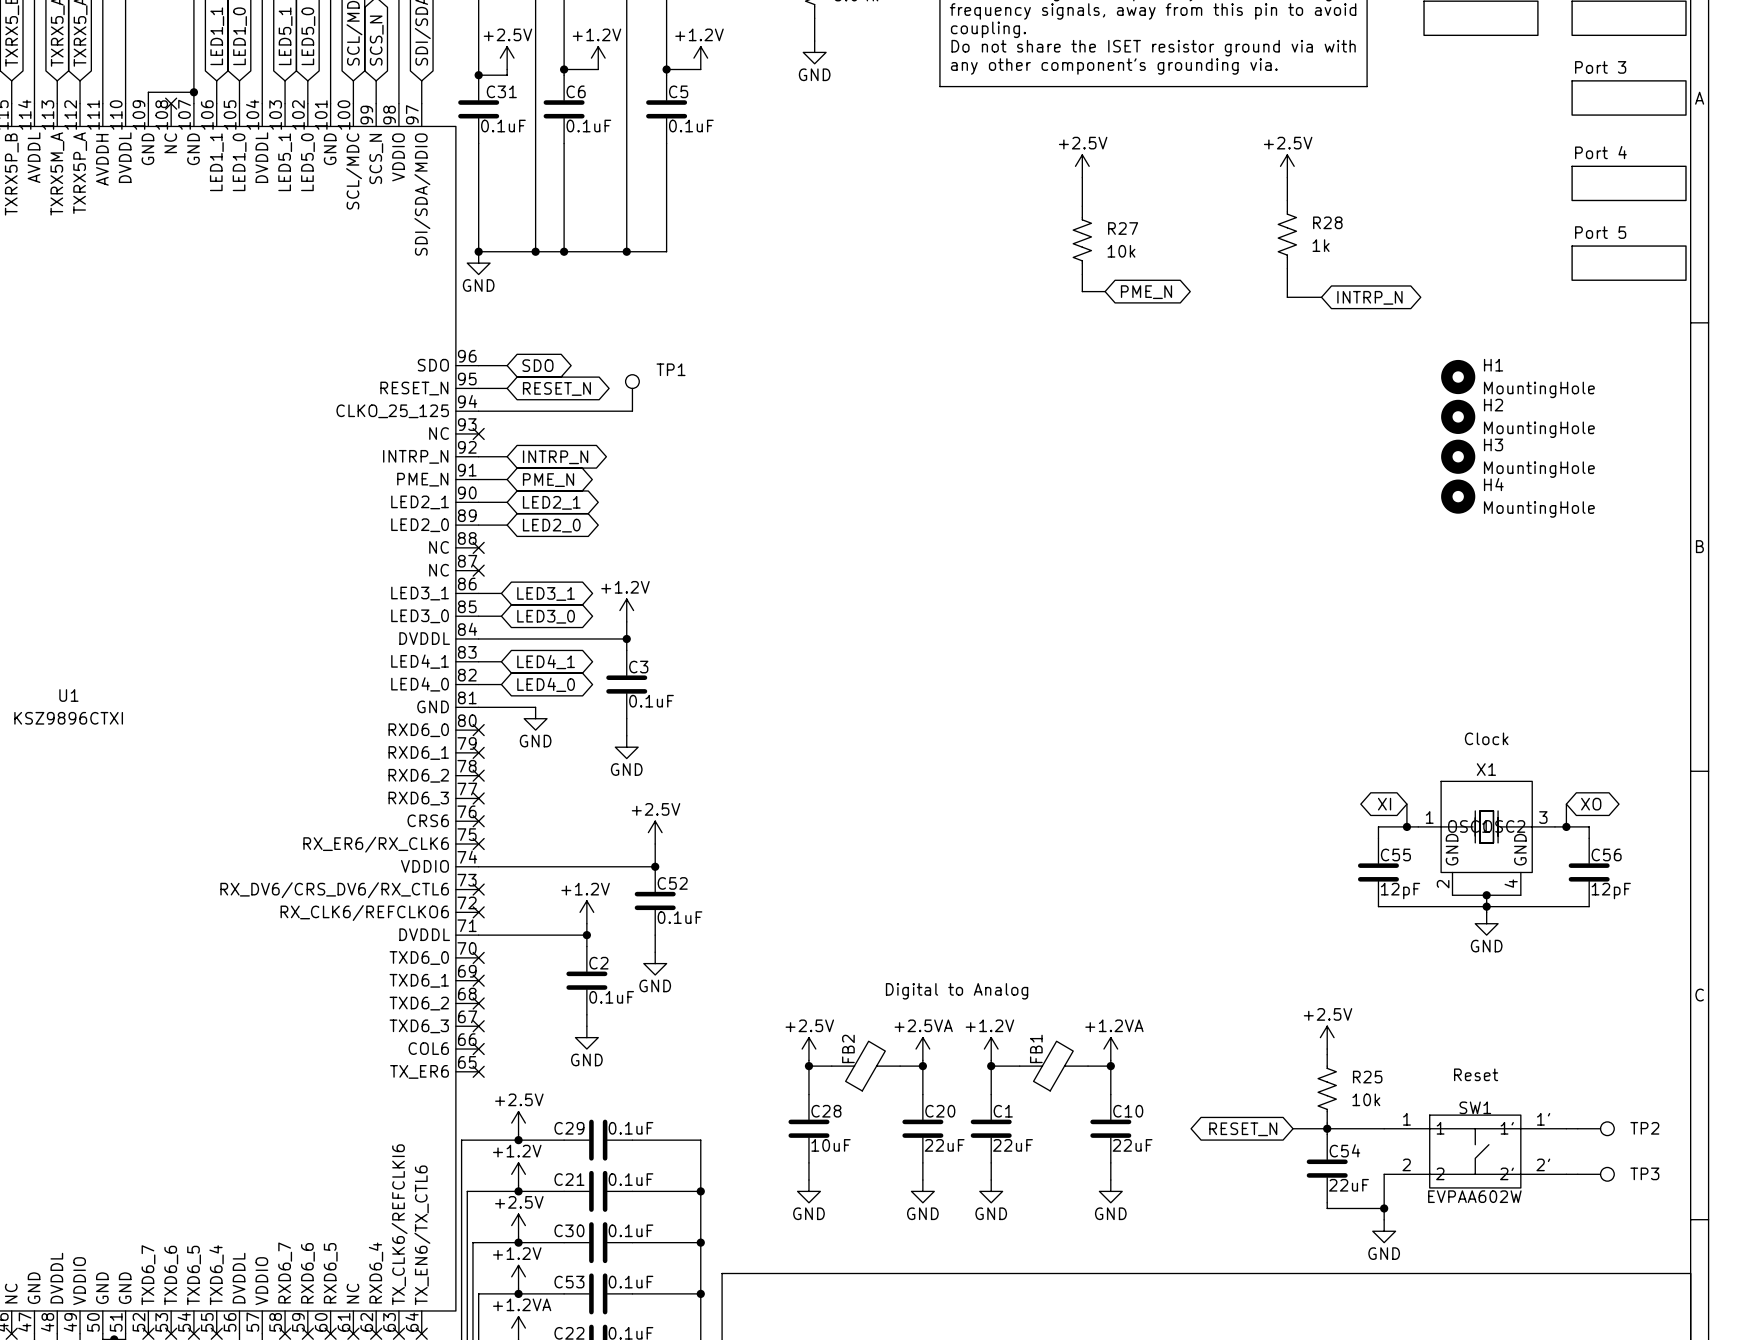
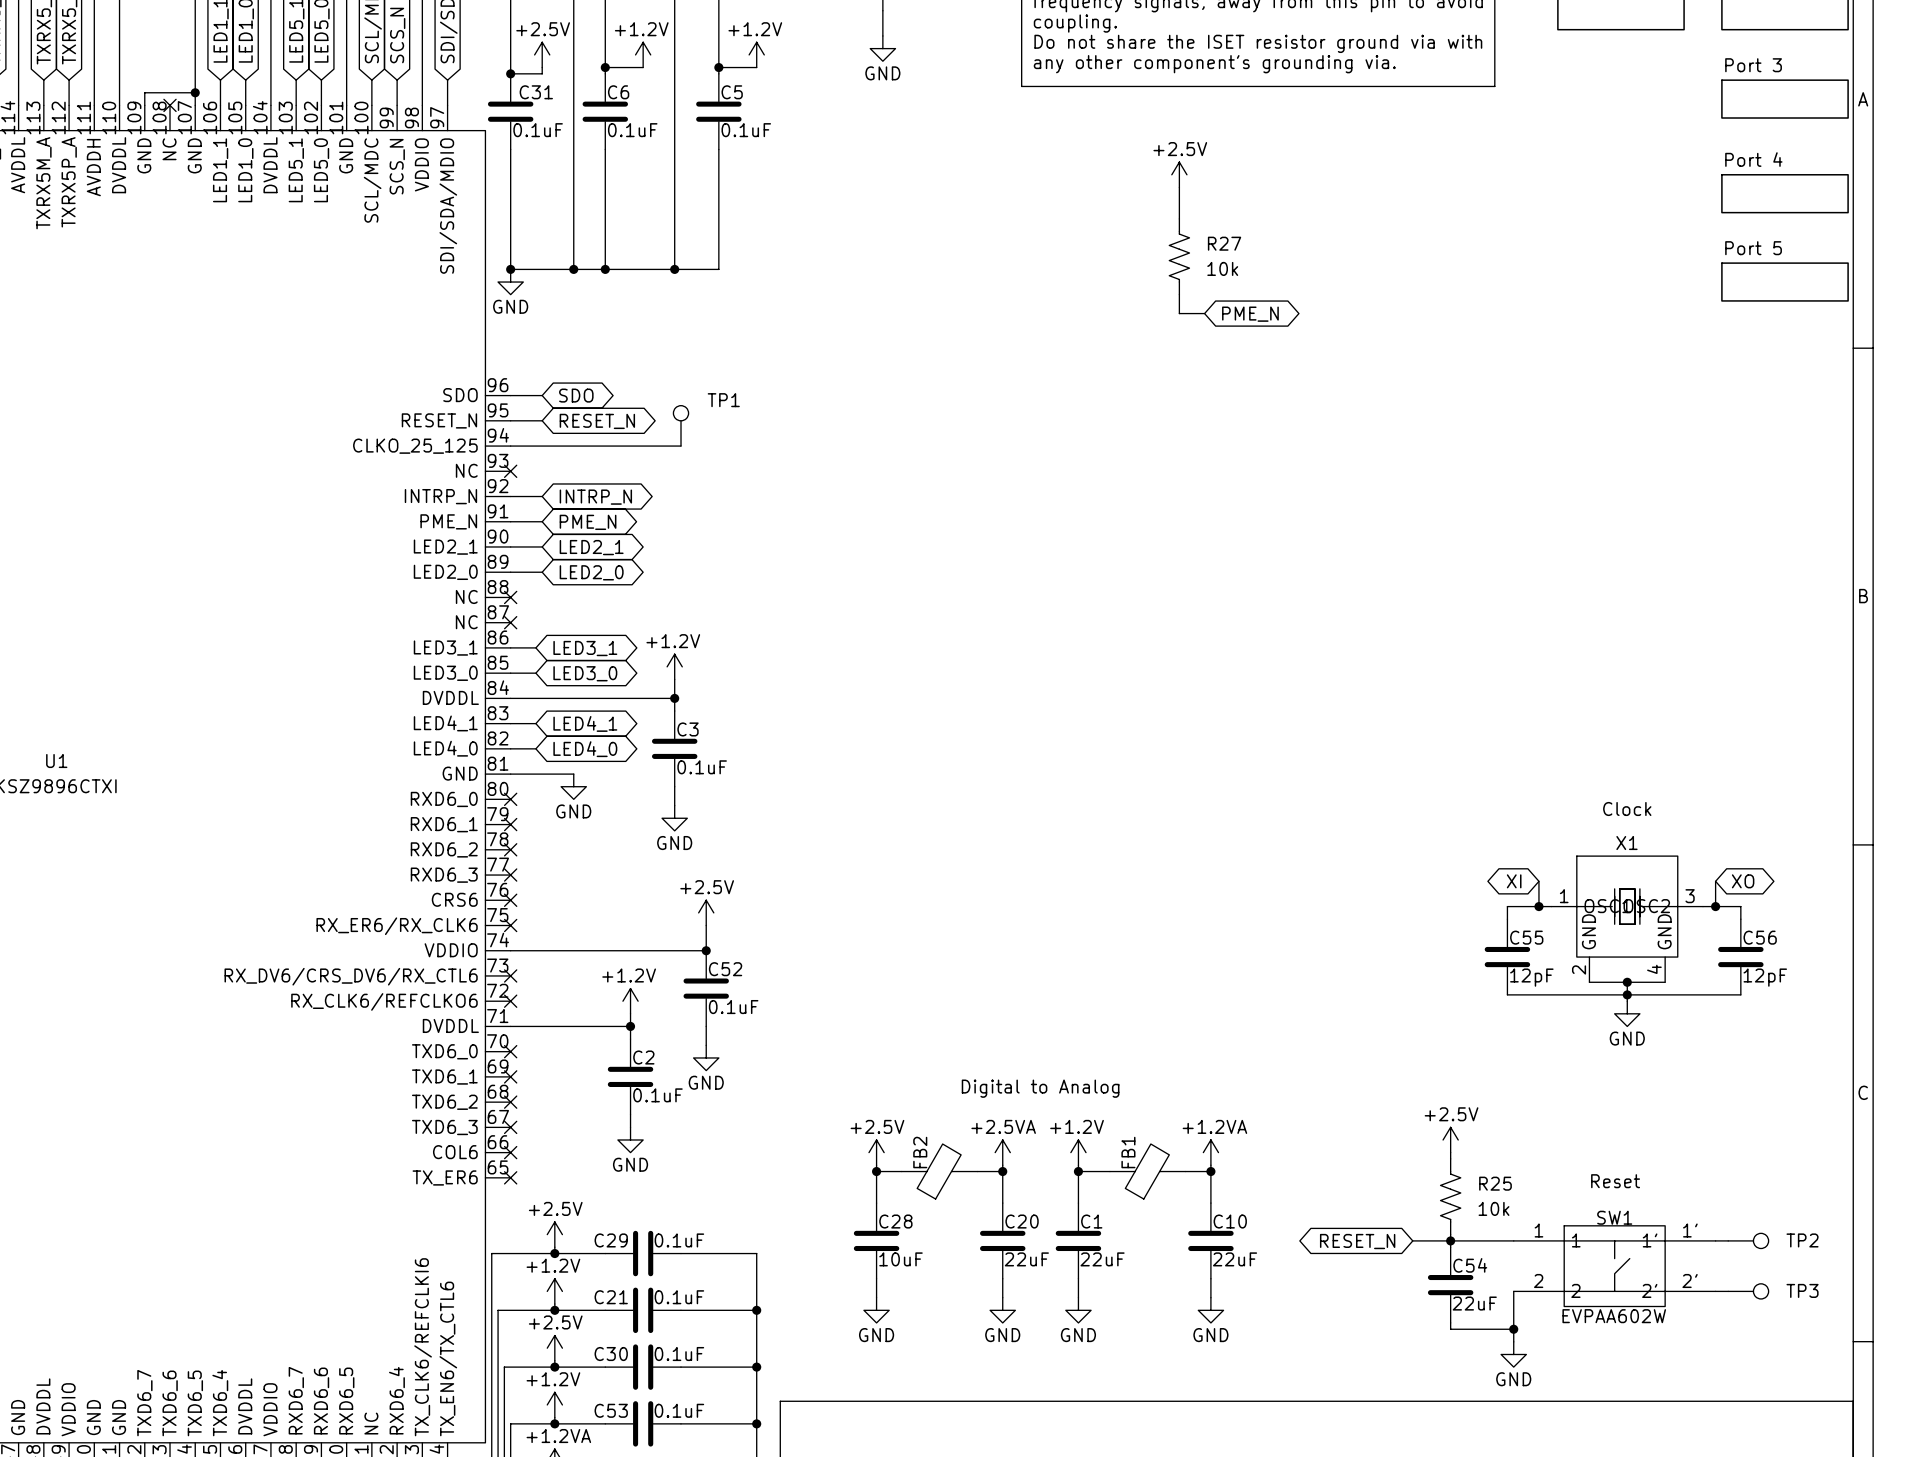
power symbol: +2.5V (1287, 166) -> none
wire: (1287, 177) (1287, 200) -> none
R28: 1k (1287, 234) -> none
wire: (1287, 268) (1287, 297) (1321, 297) -> none
global label: INTRP_N (1369, 297) -> none
H1: MountingHole (1458, 377) -> none
H2: MountingHole (1458, 416) -> none
H3: MountingHole (1458, 456) -> none
H4: MountingHole (1458, 496) -> none

